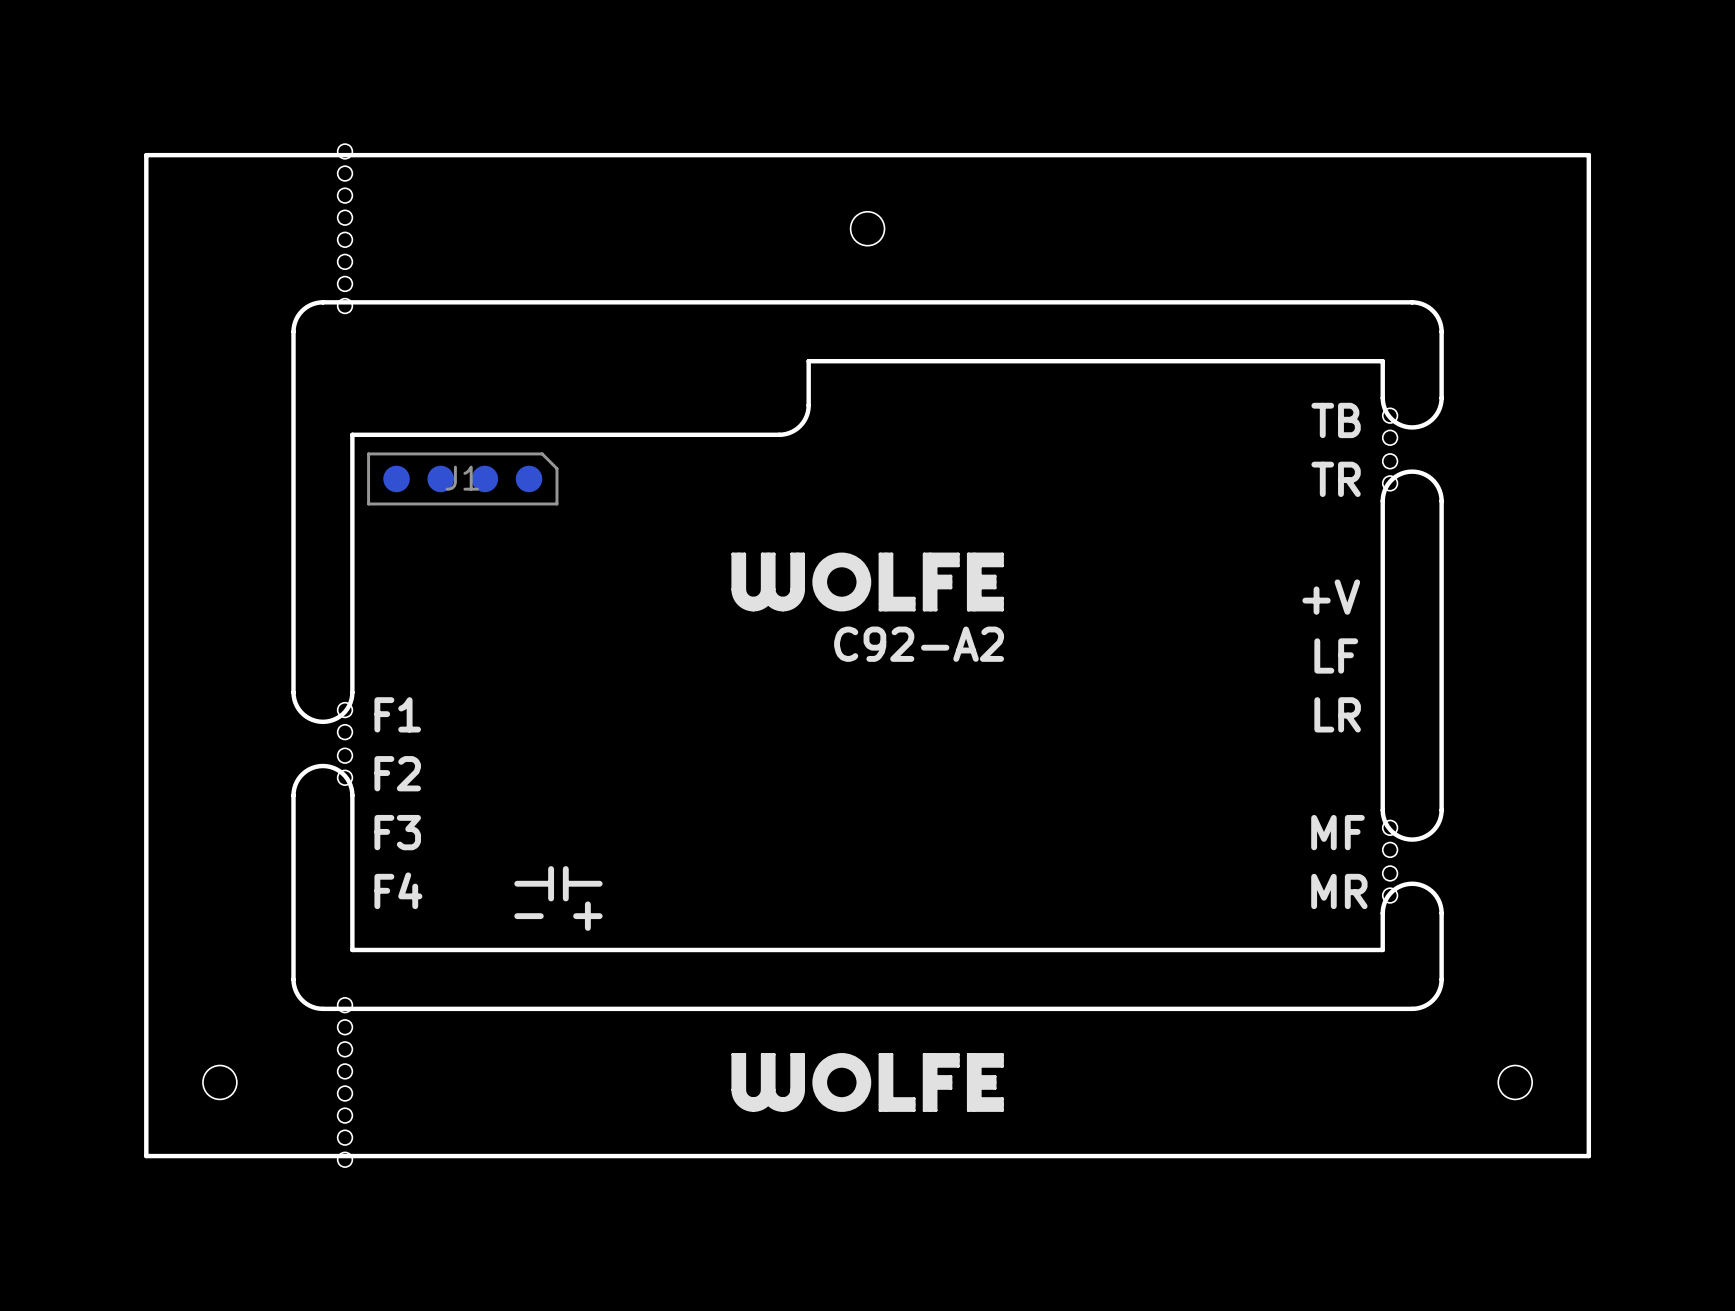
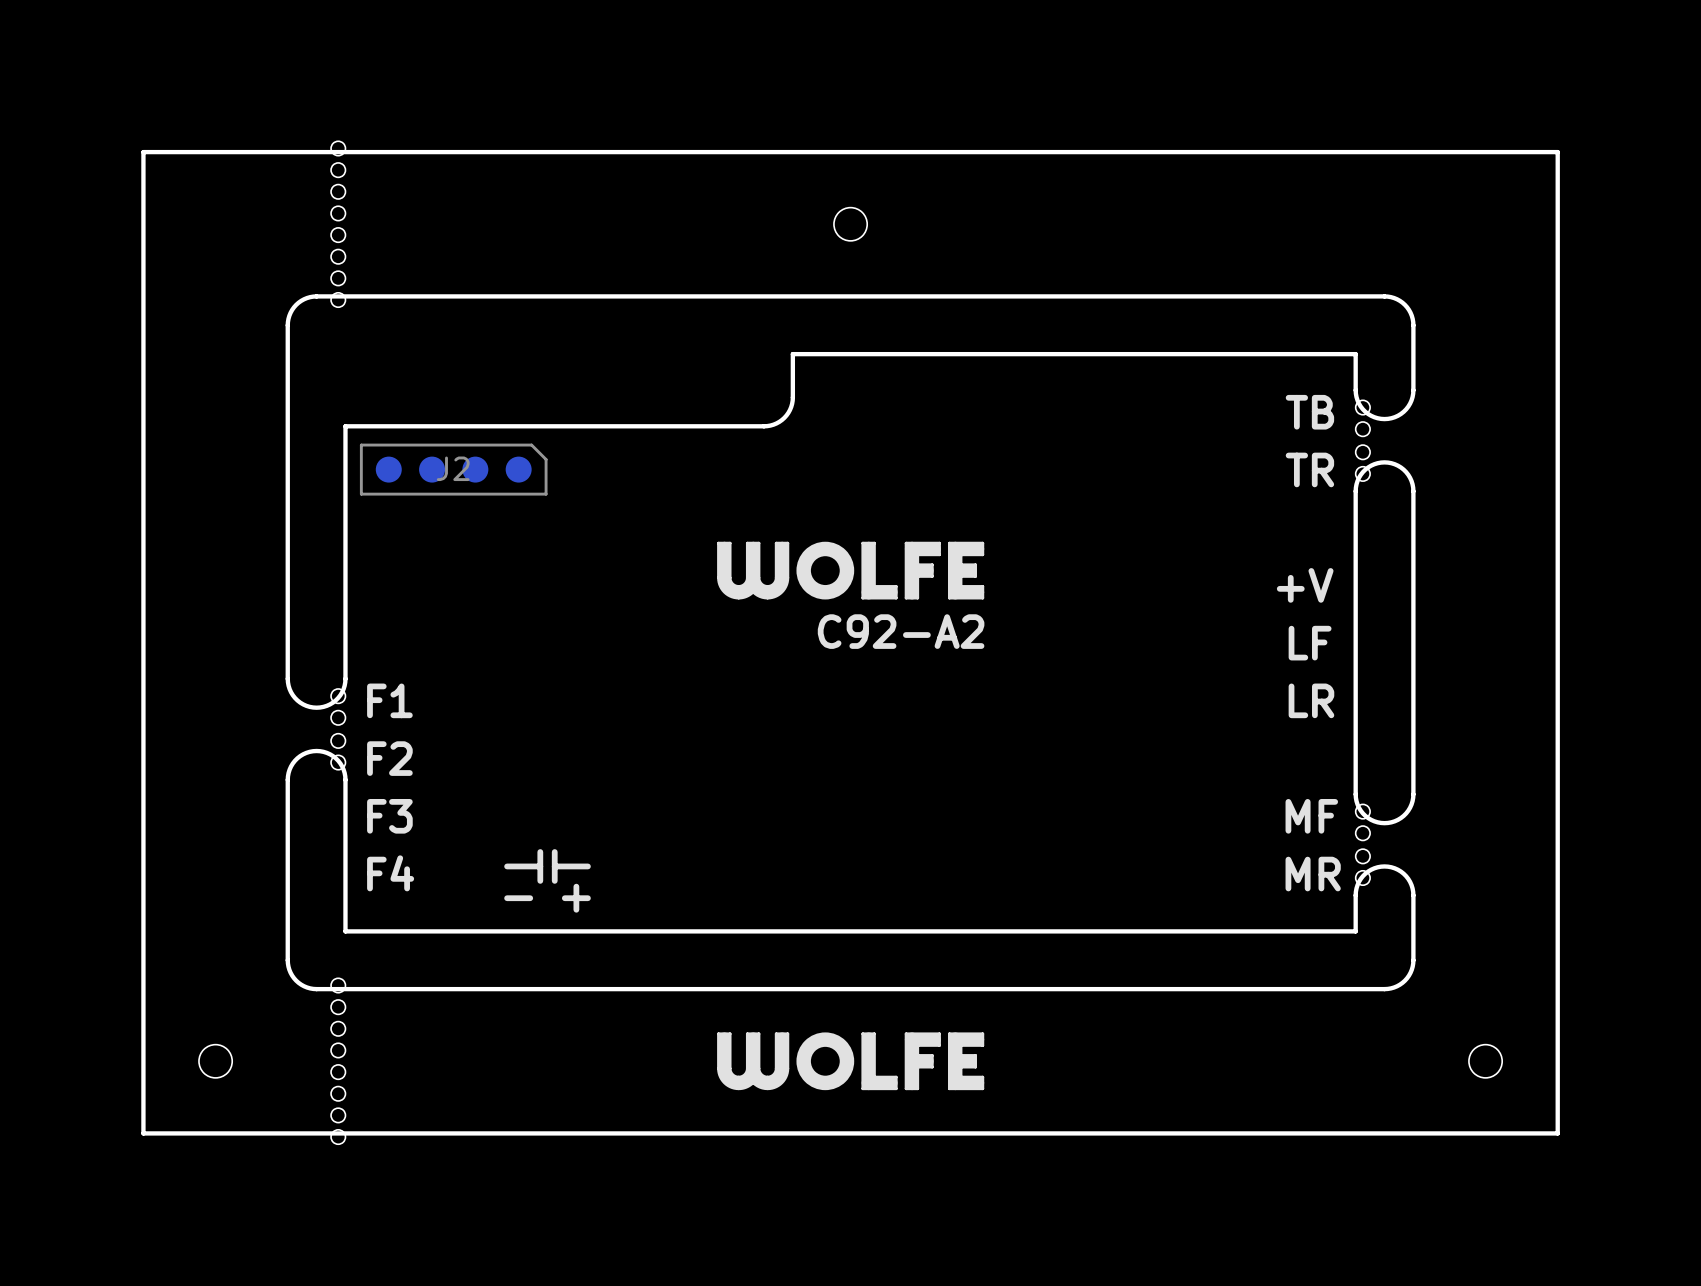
J1 name: J1 (462, 478) -> J2 (453, 468)

